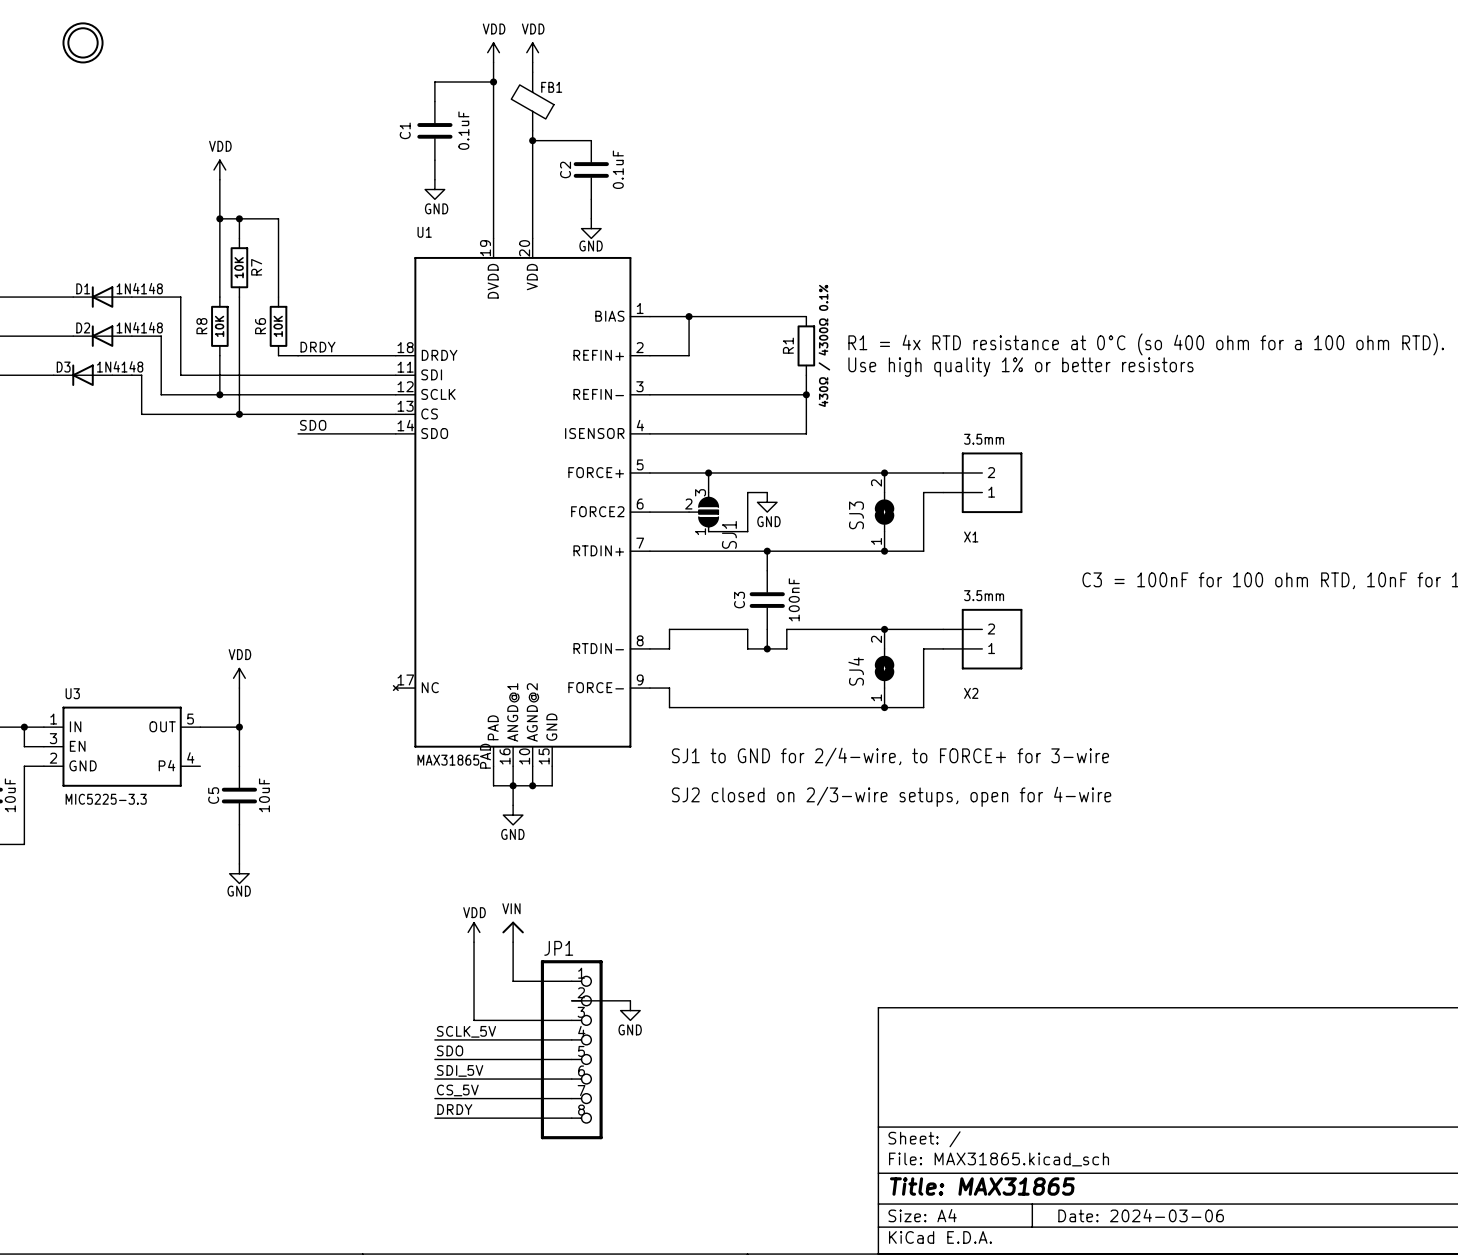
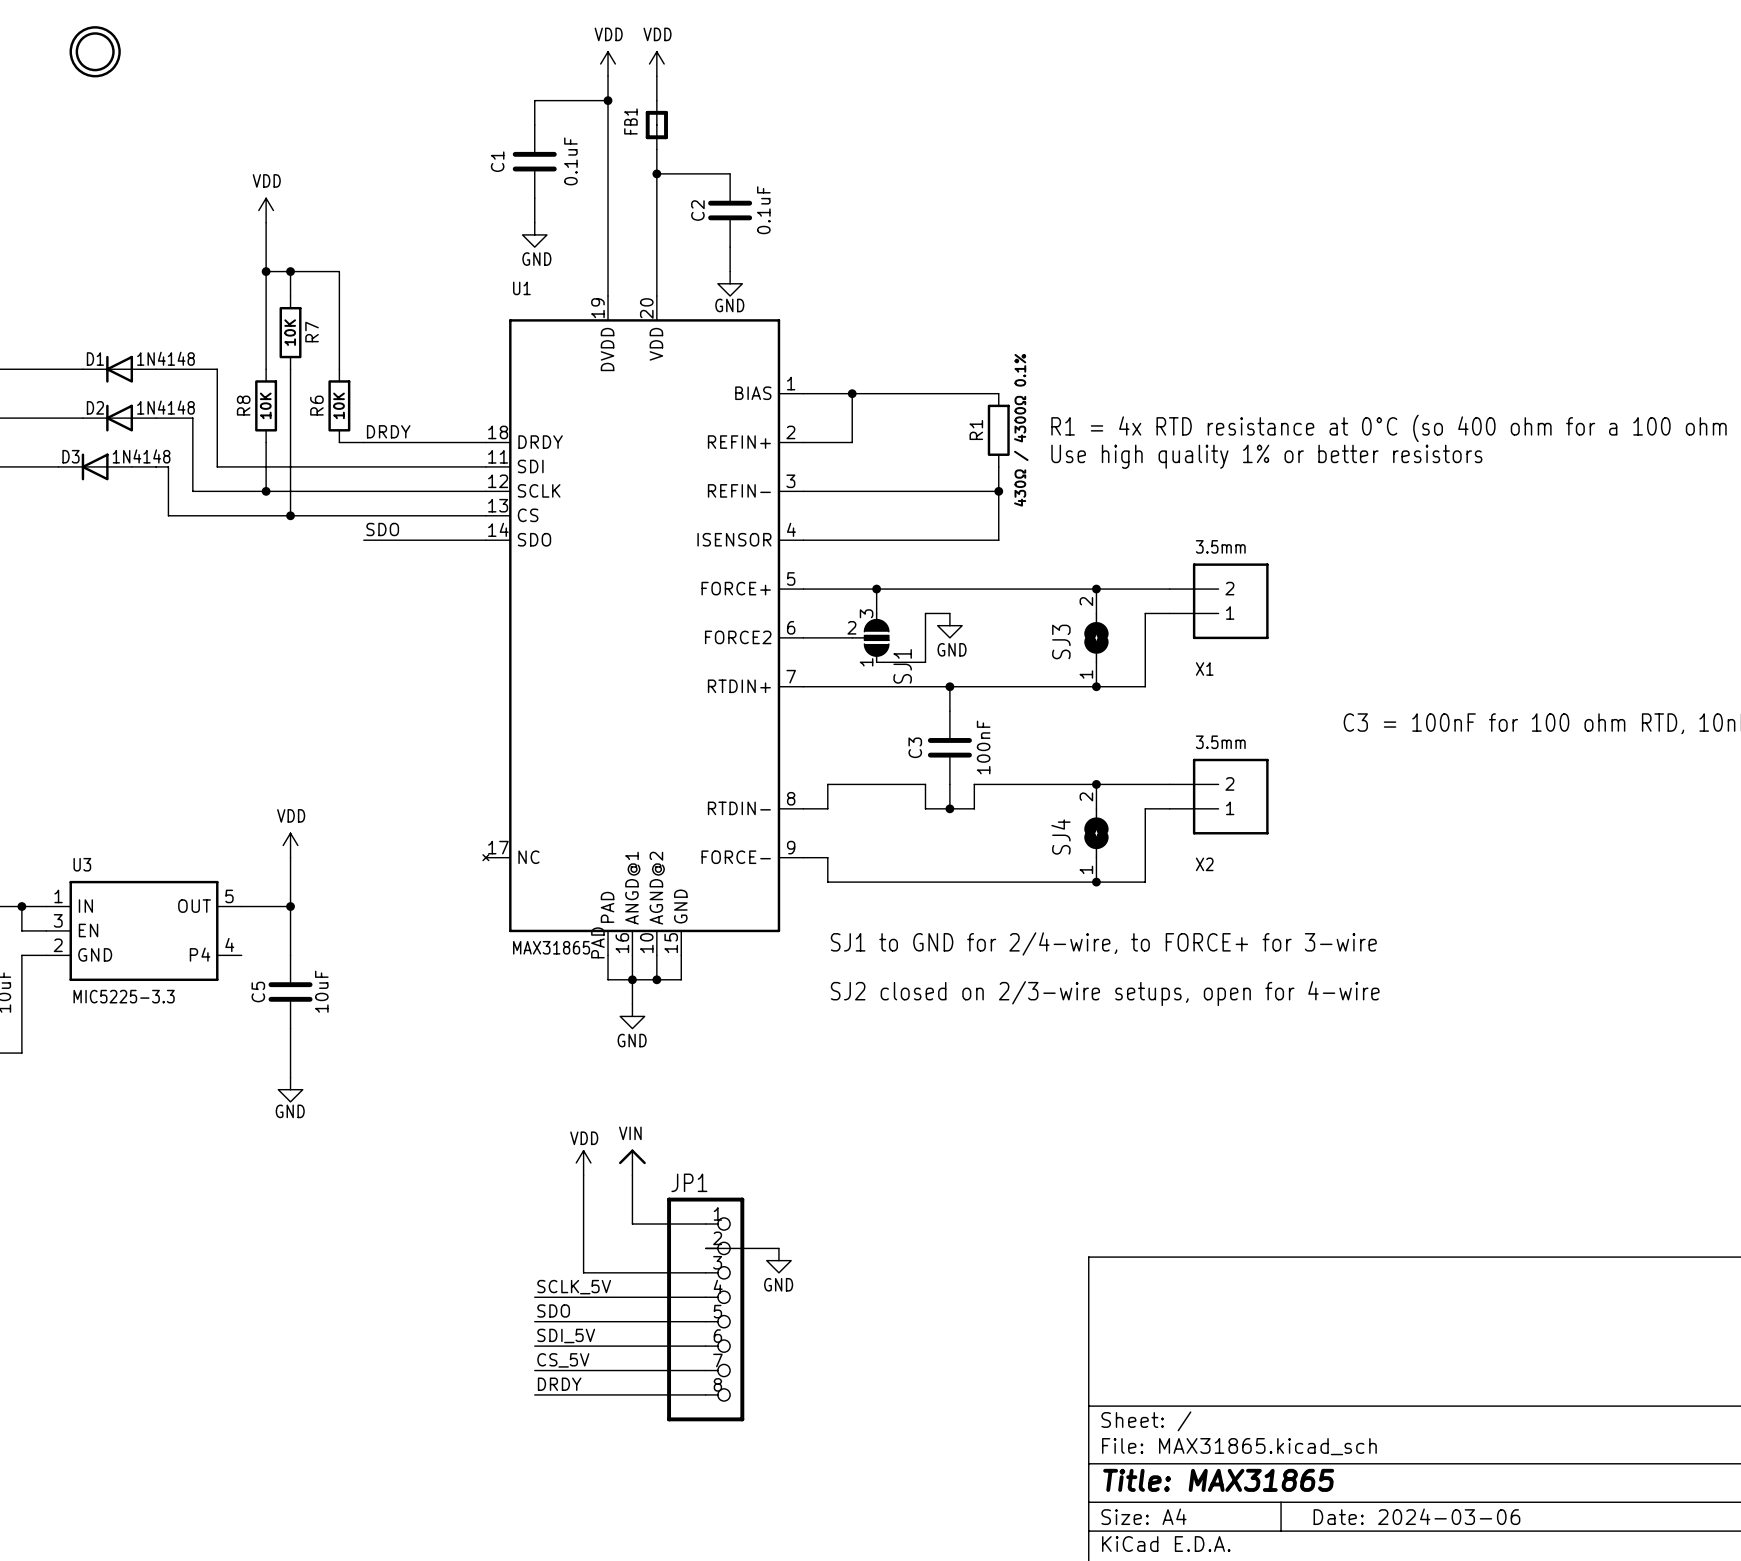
FB1 symbol: [511, 72, 554, 131] -> [645, 100, 668, 150]
FB1 name position: FB1 (551, 87) -> FB1 (630, 121)

